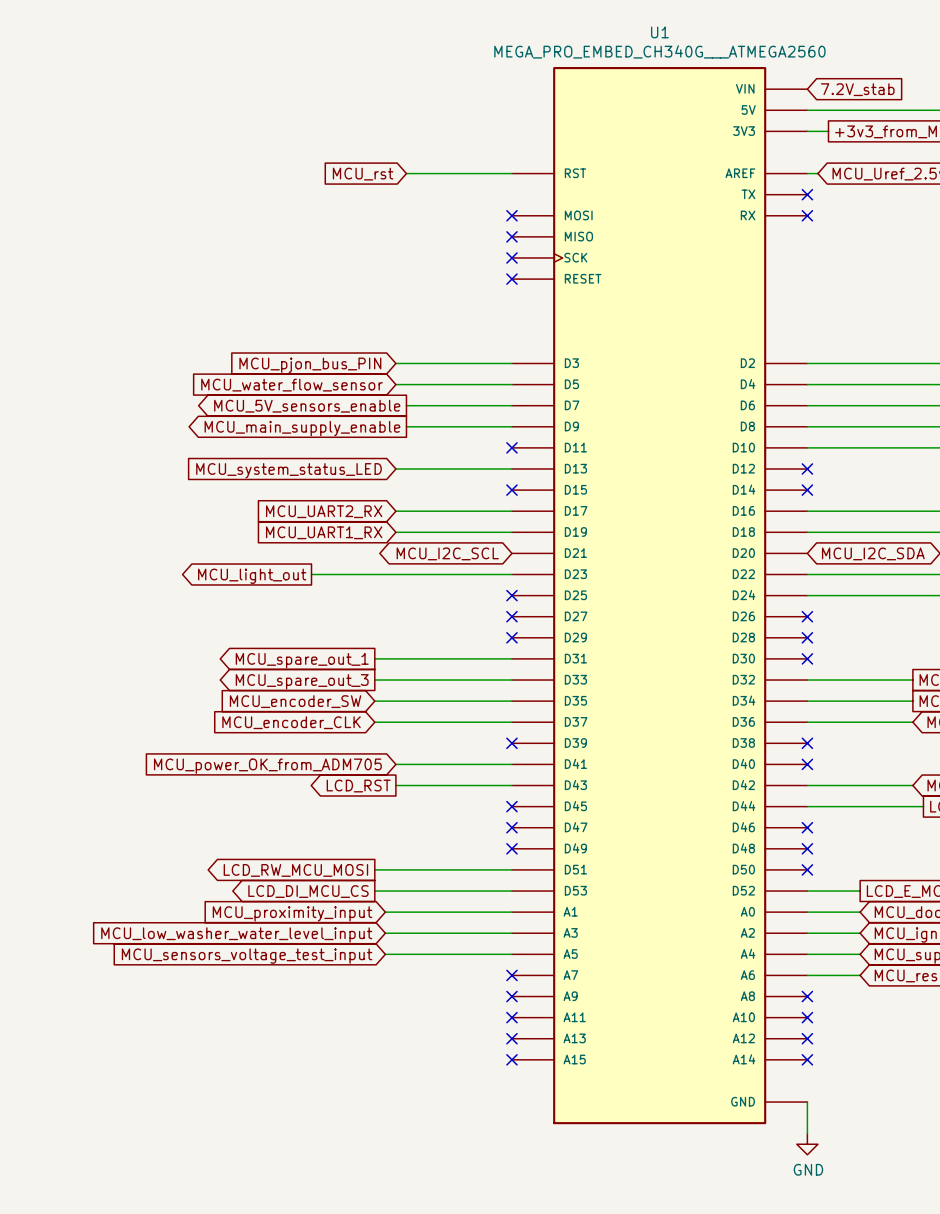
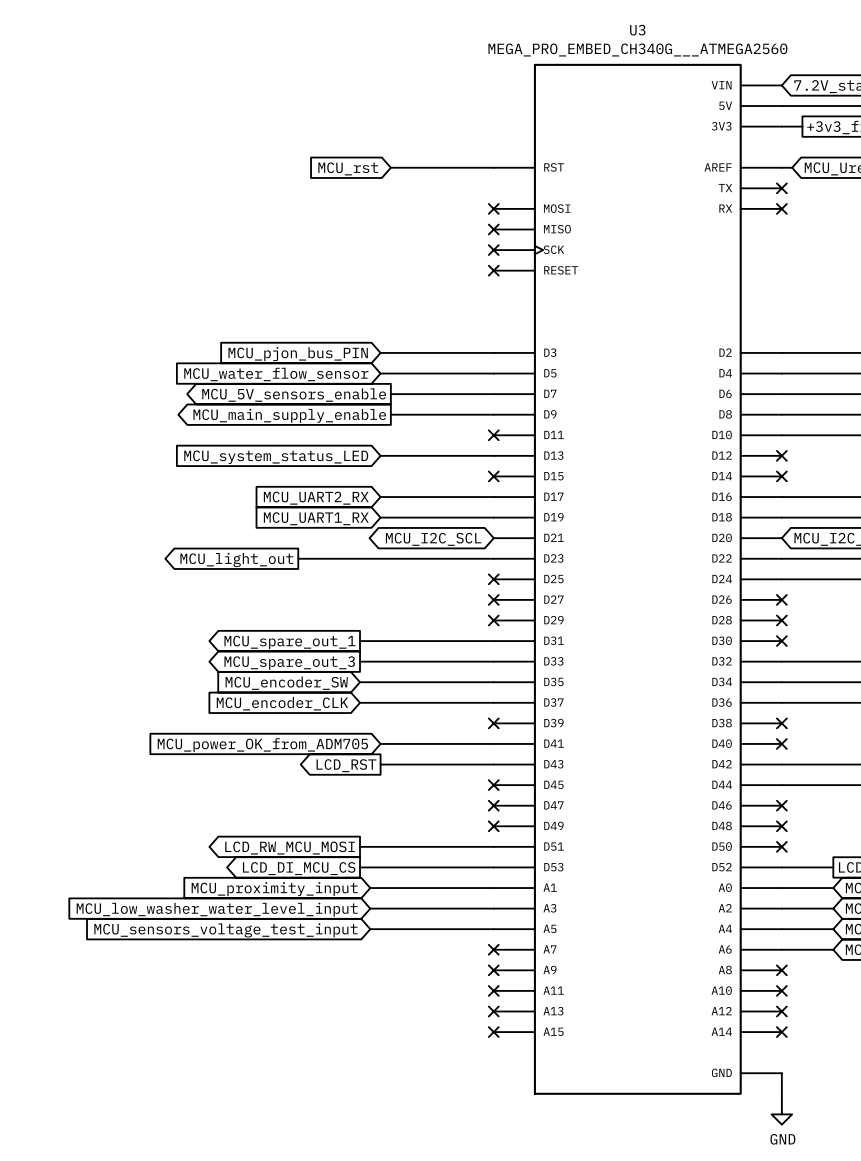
U1 name: U1 (659, 32) -> U3 (637, 30)

